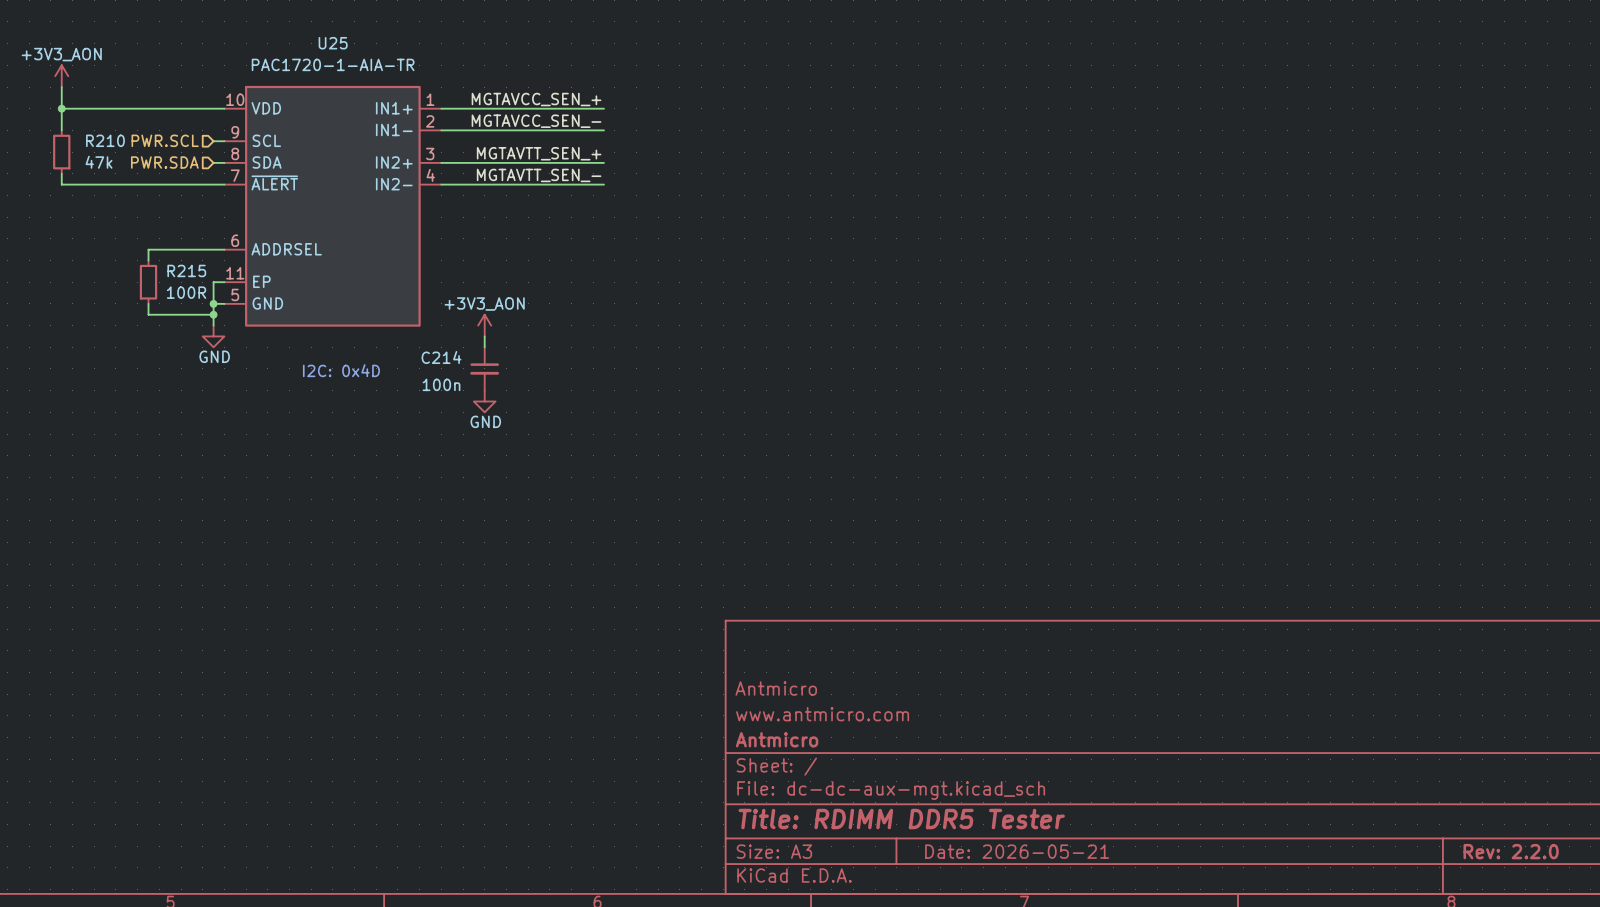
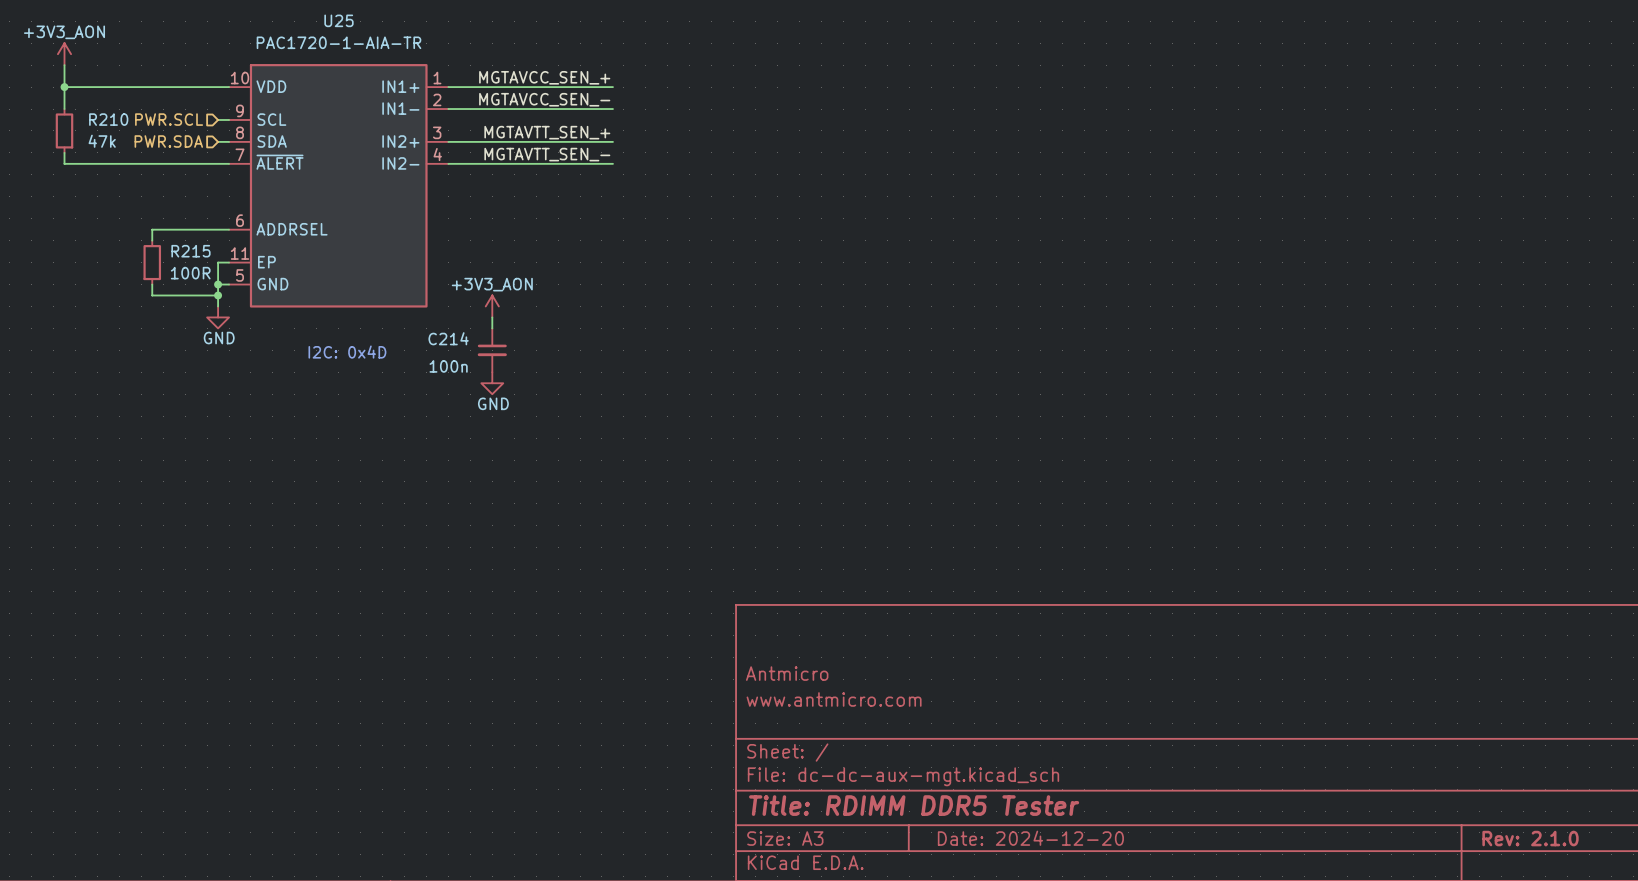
title block: Antmicro (777, 739) -> none
title block: Date: 2026-05-21 (1017, 851) -> Date: 2024-12-20 (1030, 838)
title block: Rev: 2.2.0 (1511, 851) -> Rev: 2.1.0 (1530, 838)

